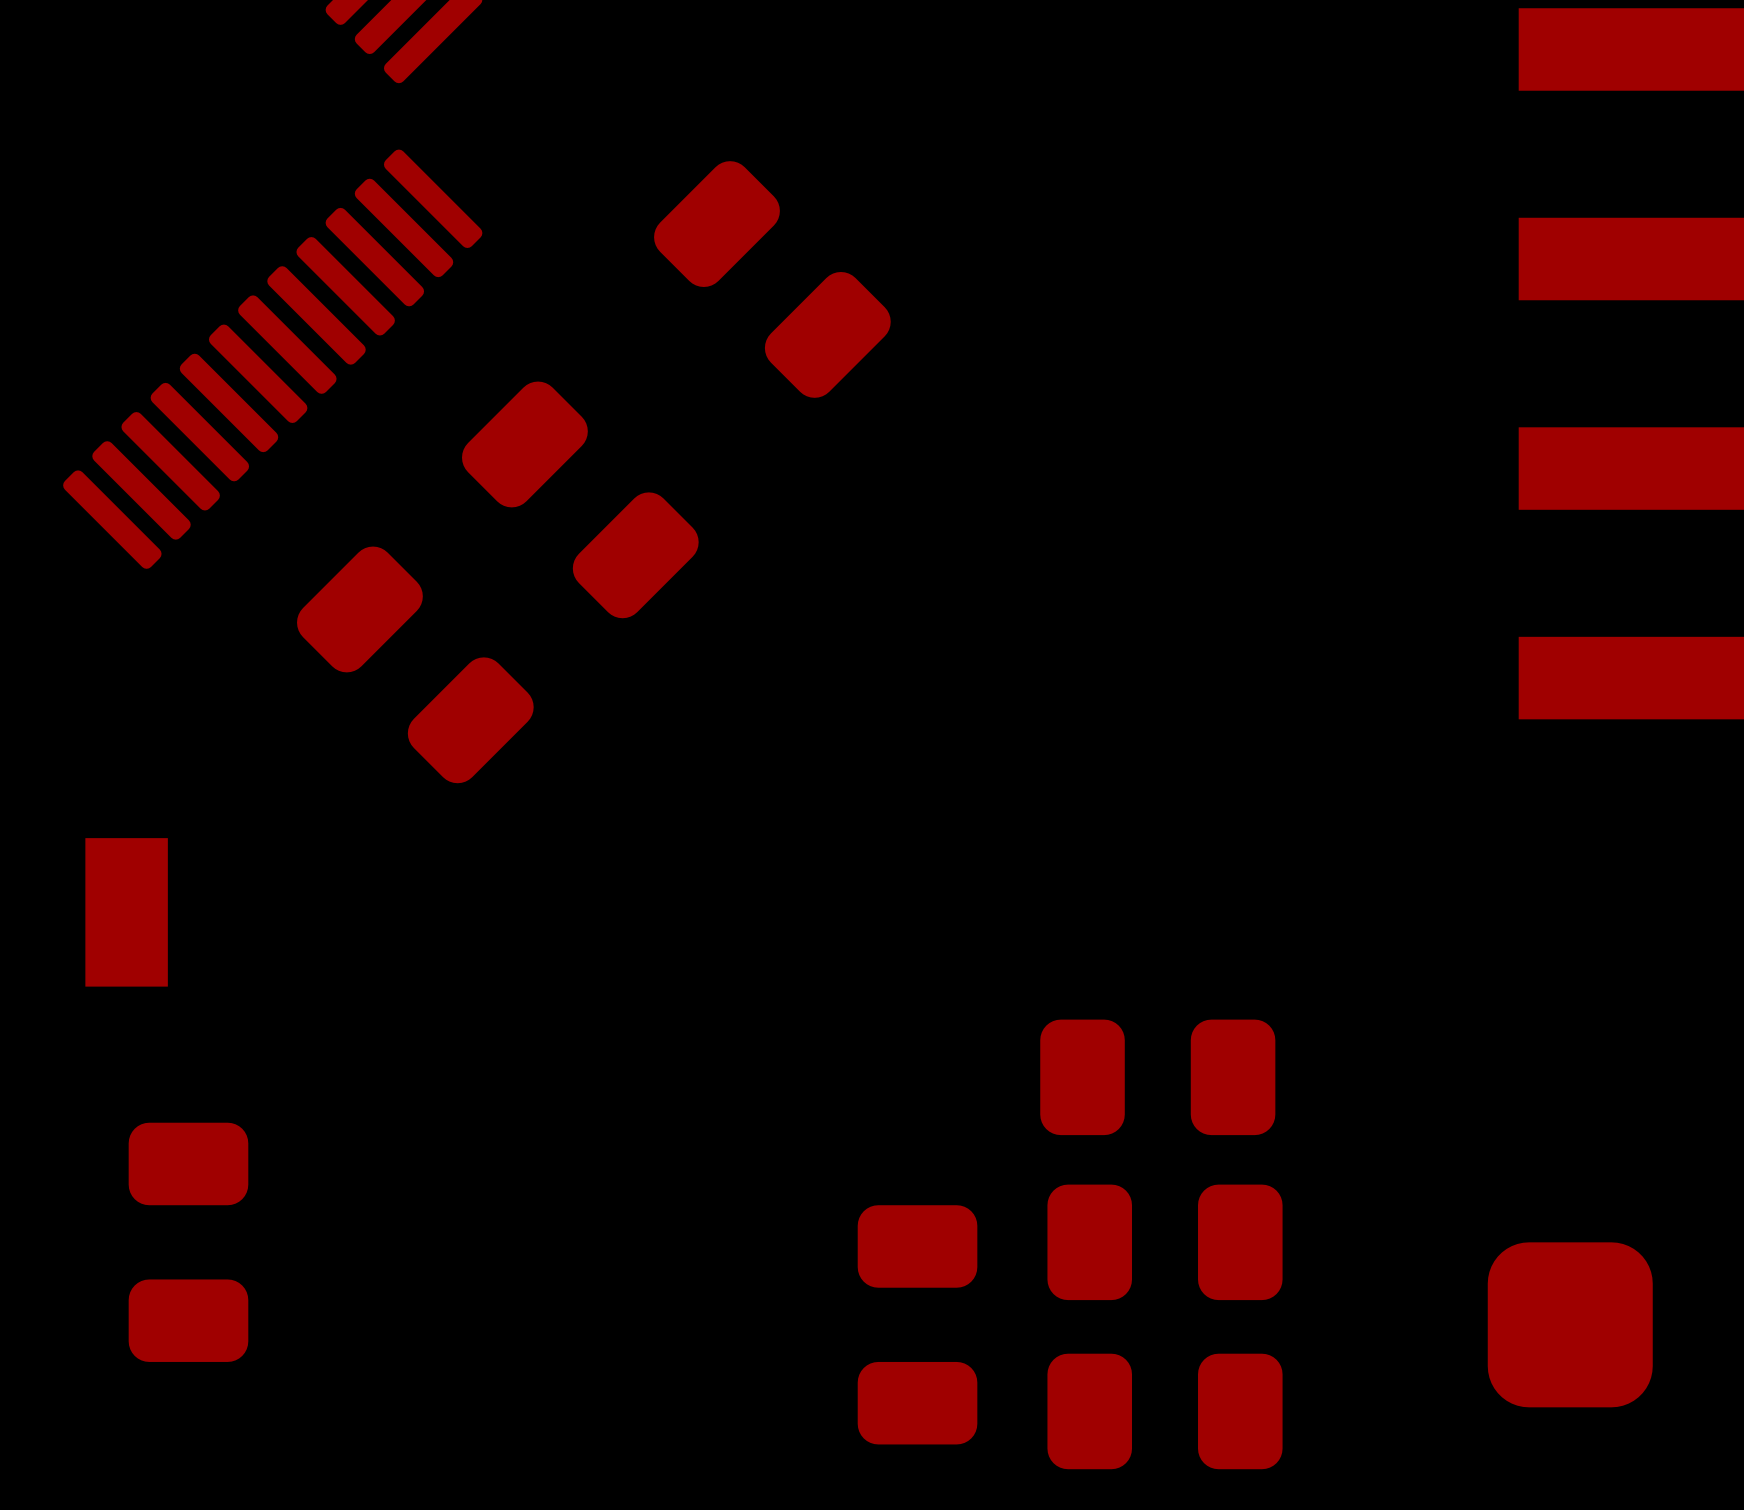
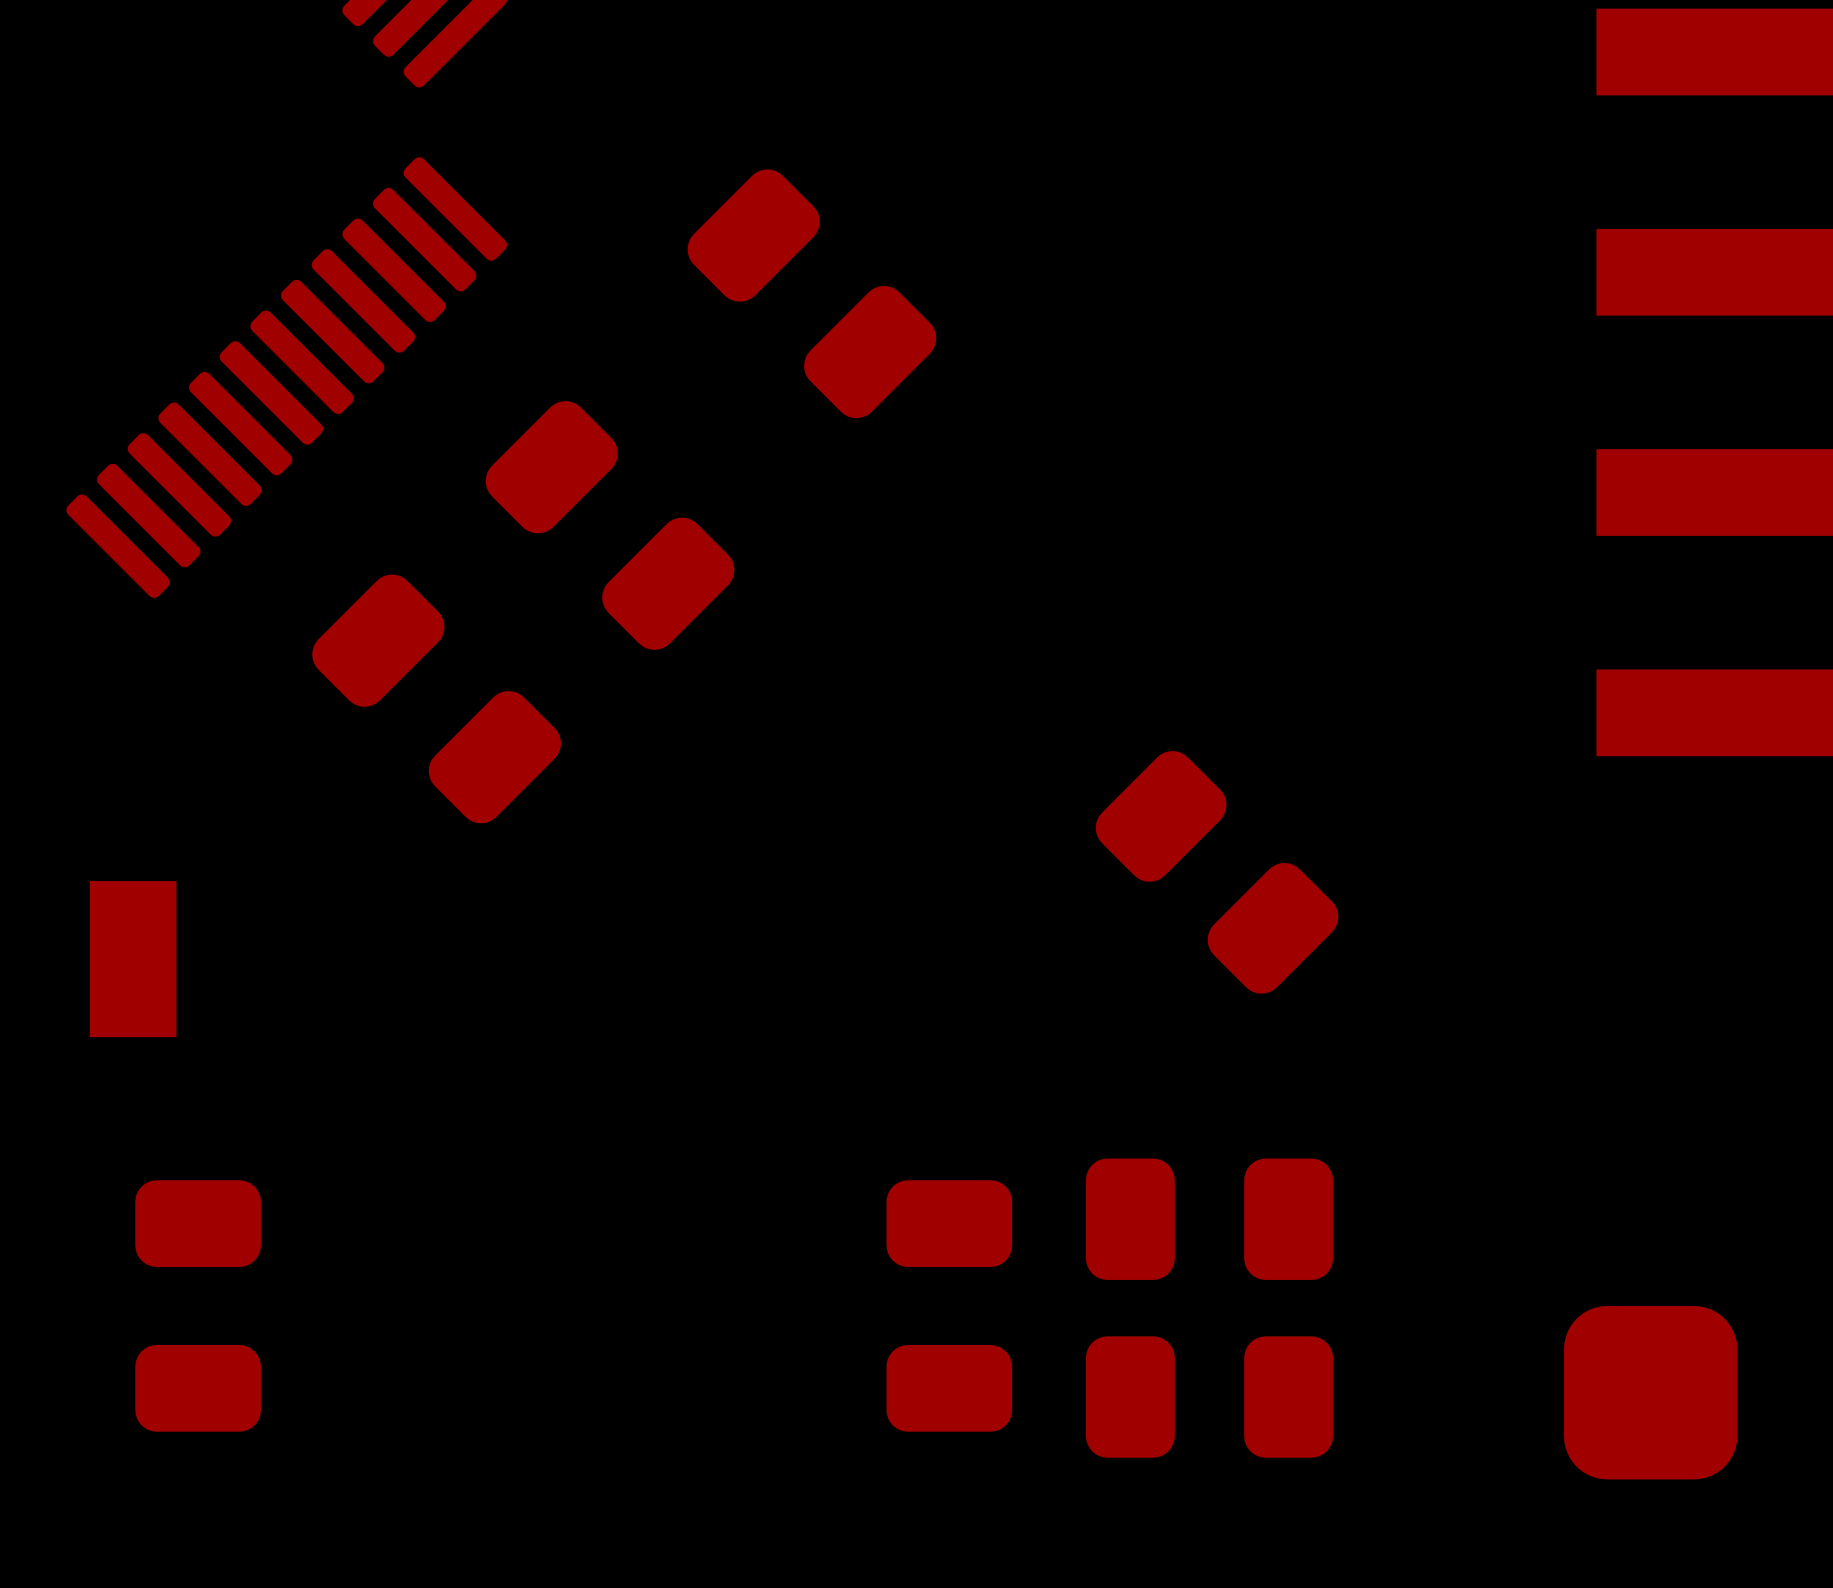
part: none -> (1217, 872)
part: (1157, 1077) -> none
part: none -> (1209, 1219)
part: (1165, 1242) -> none
part position: (917, 1324) -> (949, 1305)
part: none -> (1209, 1397)
part: (1165, 1411) -> none

